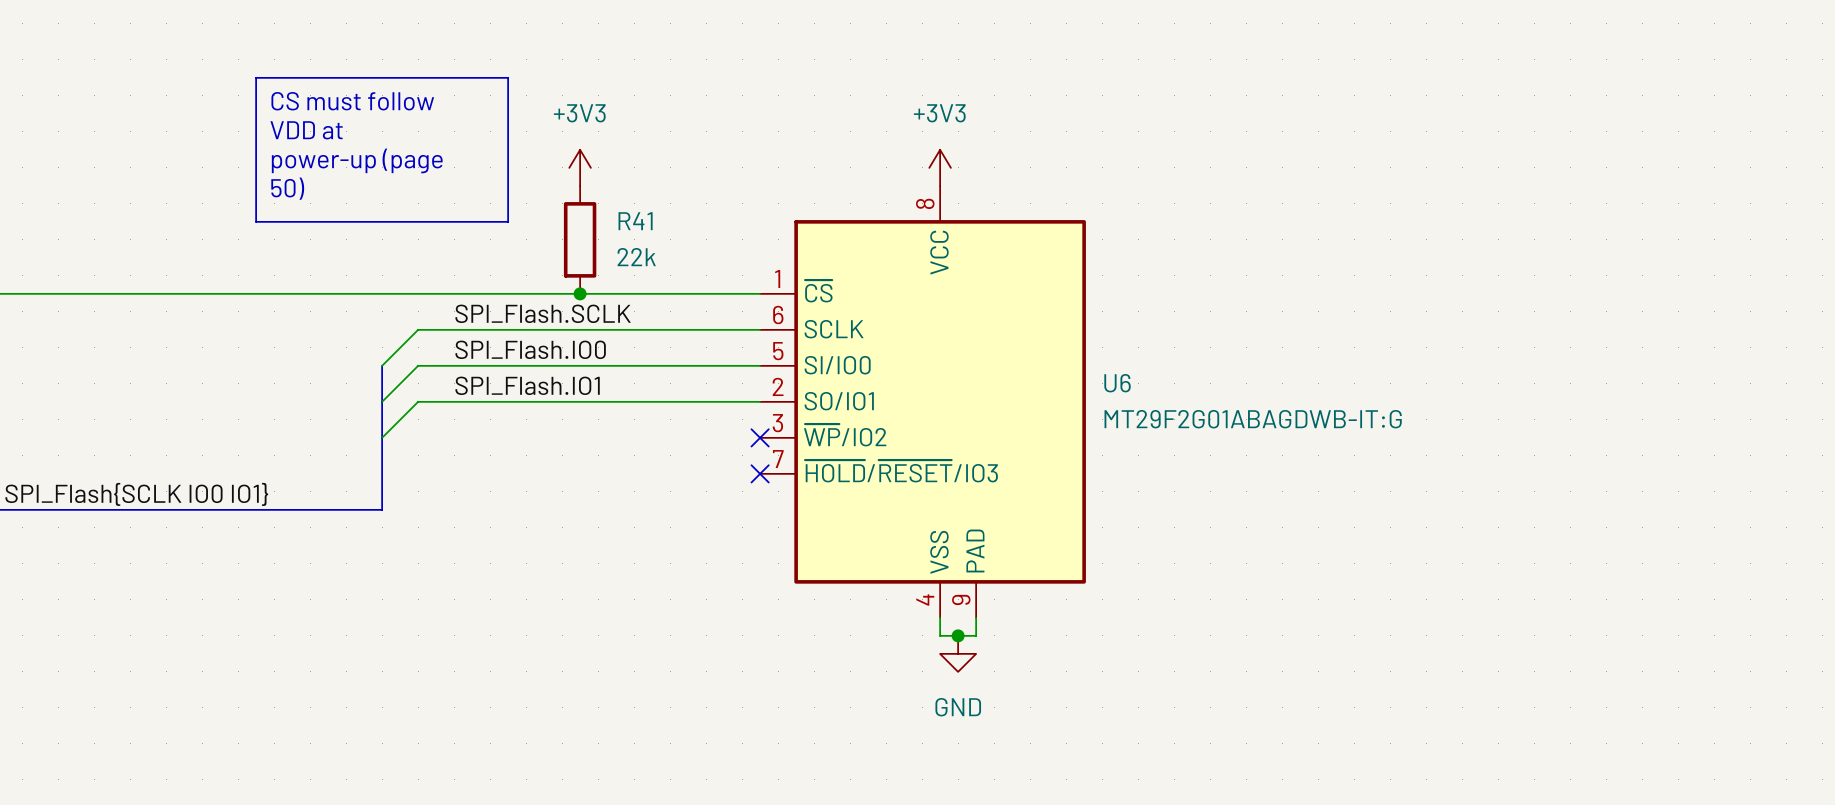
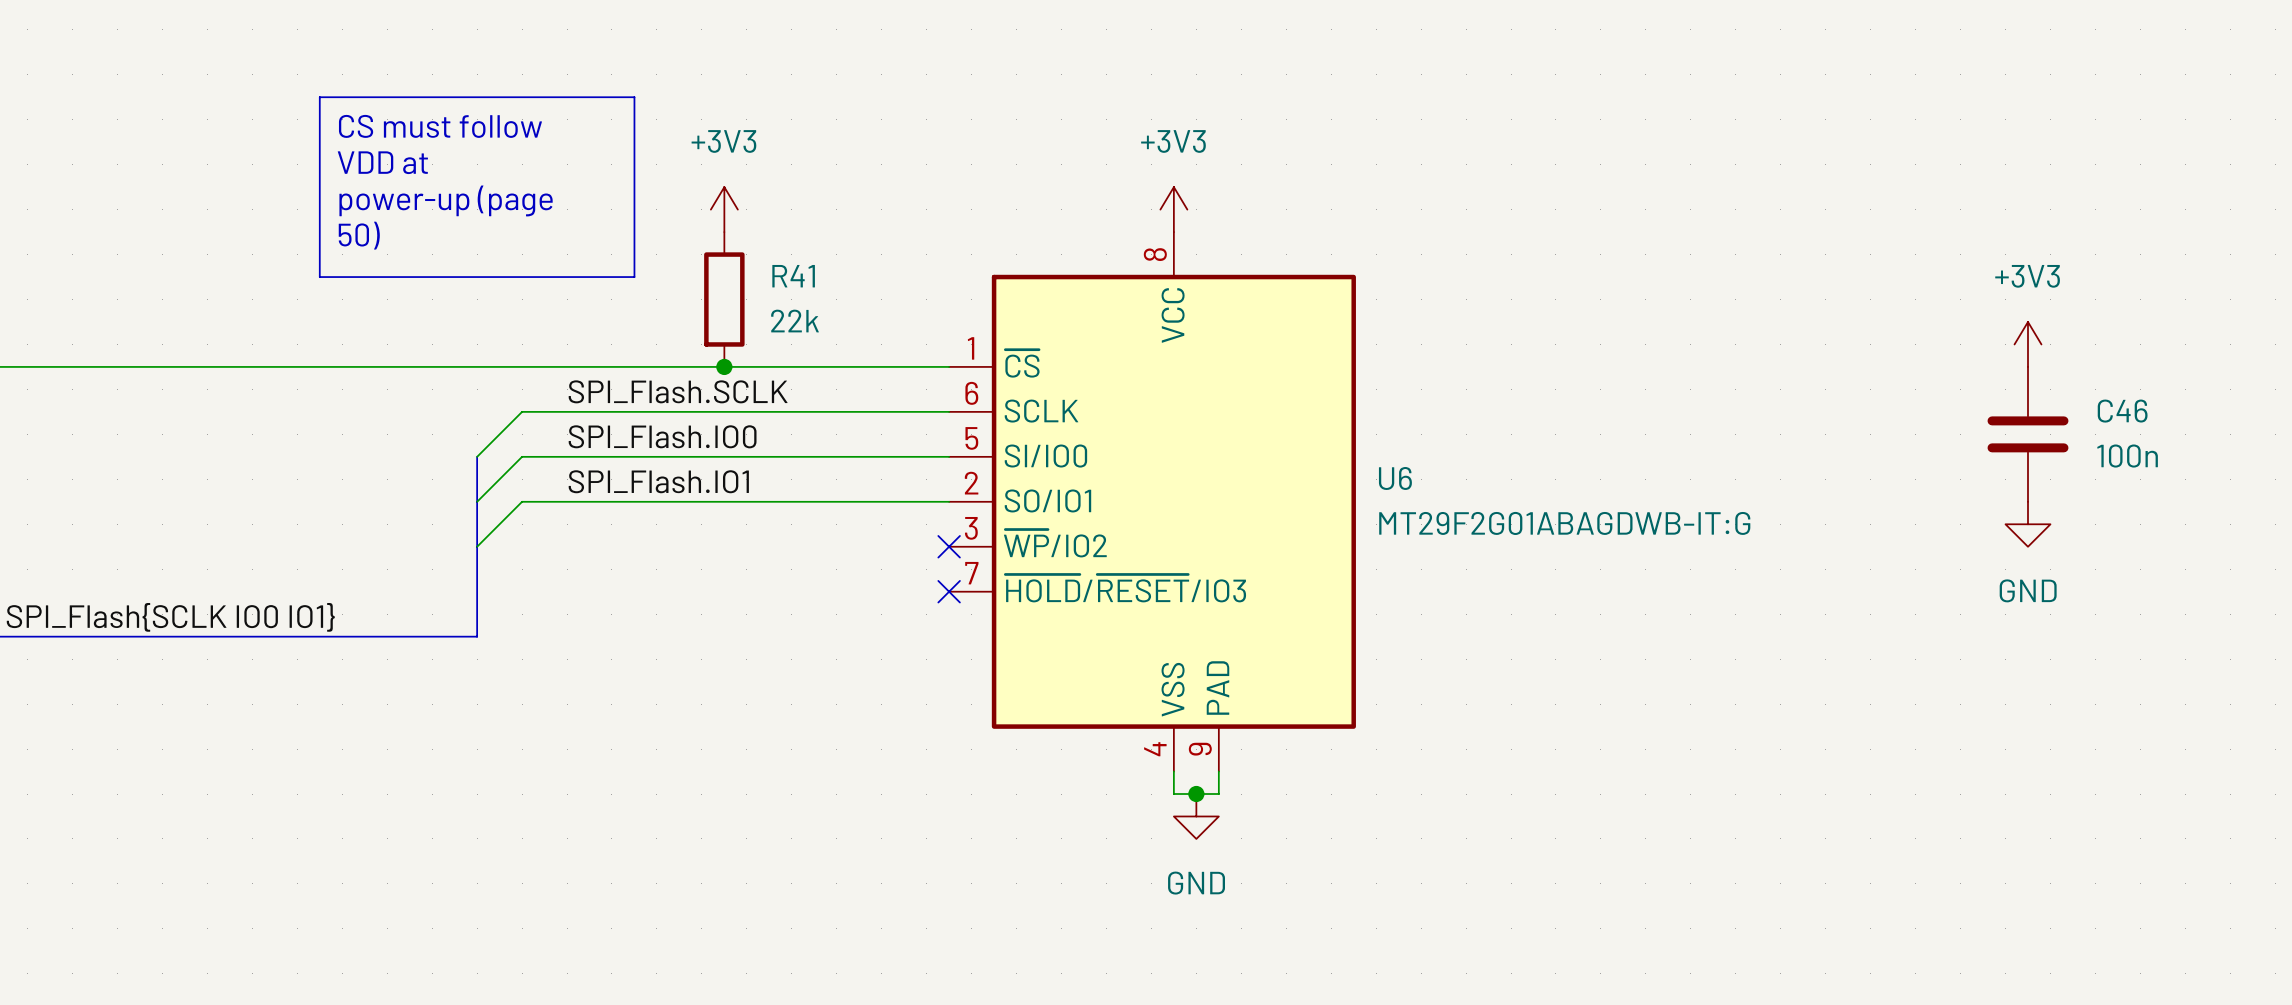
power symbol: none -> +3V3 (2028, 344)
C46: none -> 100n (2028, 434)
power symbol: none -> GND (2028, 524)

